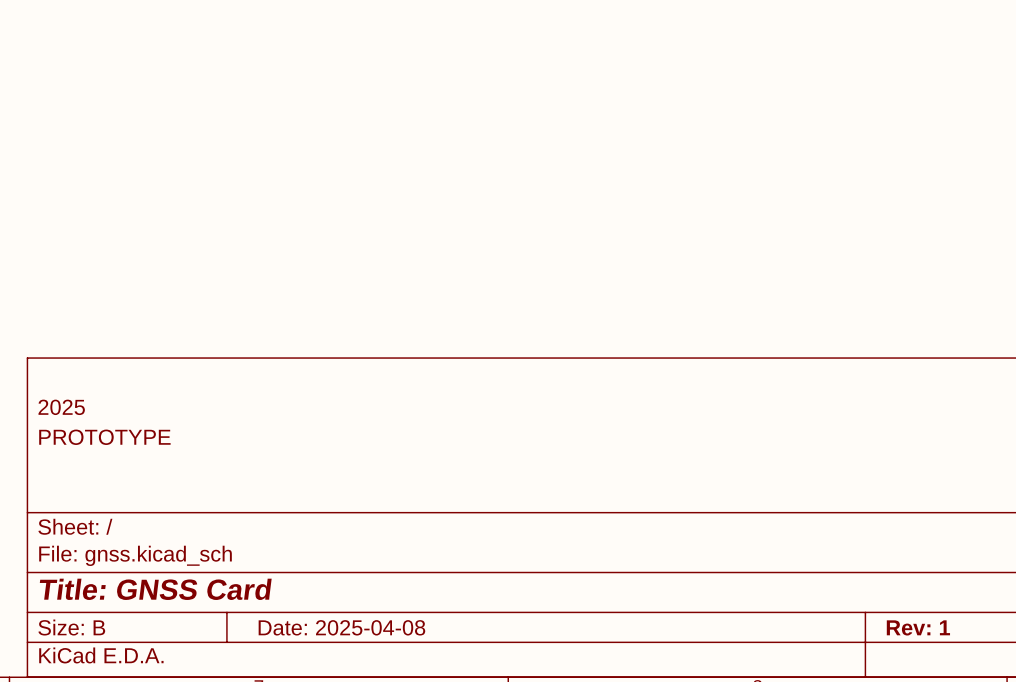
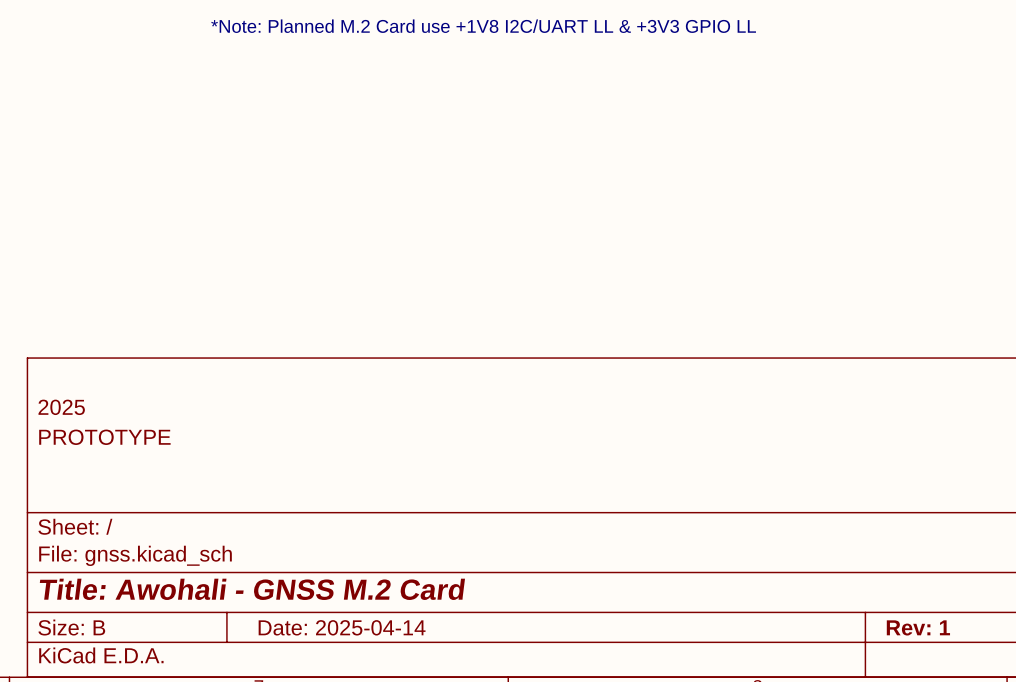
text: none -> *Note: Planned M.2 Card use +1V8 I2C/UART LL & +3V3 GPIO LL (483, 26)
title block: Title: GNSS Card (155, 589) -> Title: Awohali - GNSS M.2 Card (252, 589)
title block: Date: 2025-04-08 (341, 627) -> Date: 2025-04-14 (342, 627)

